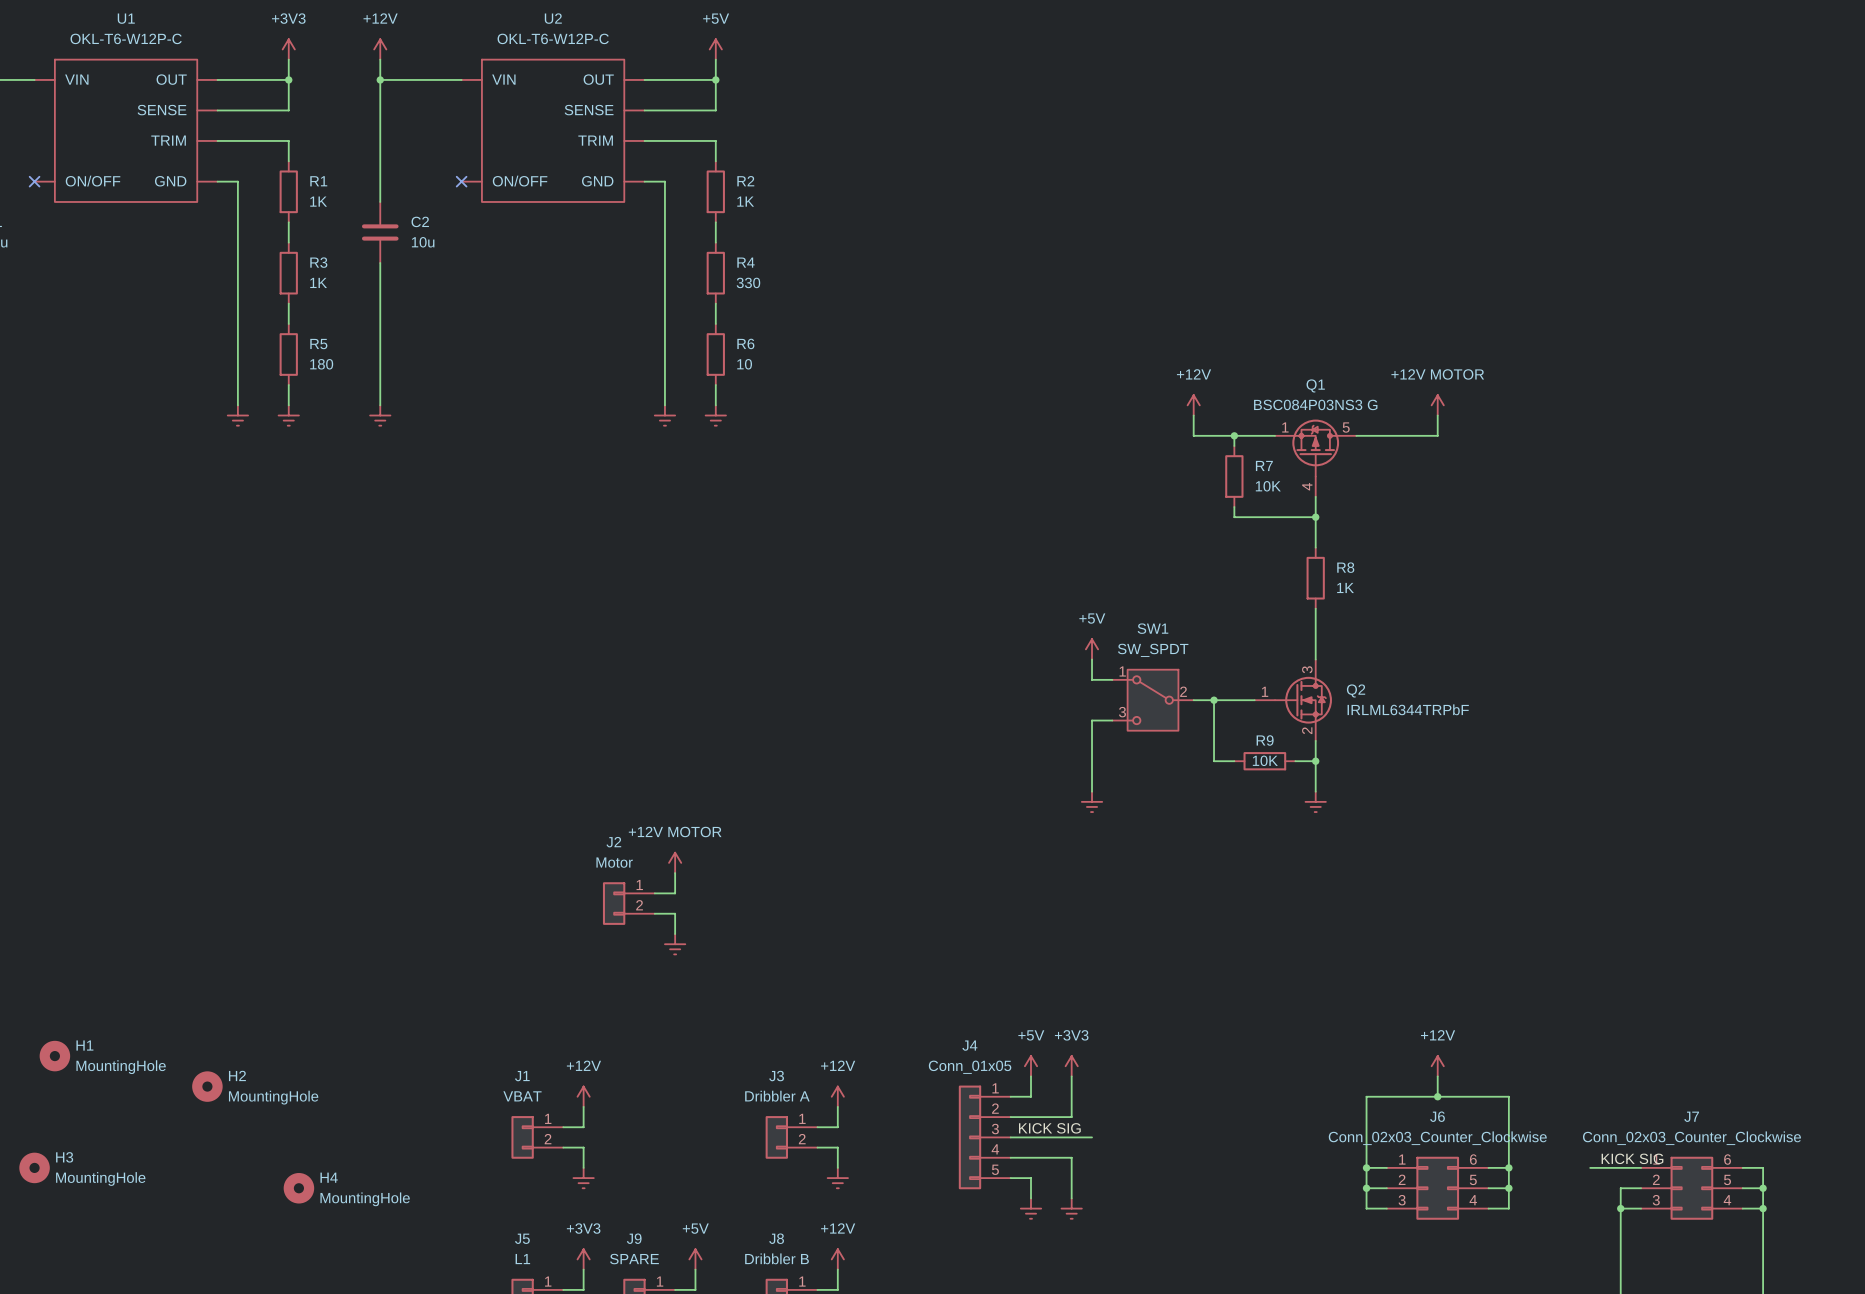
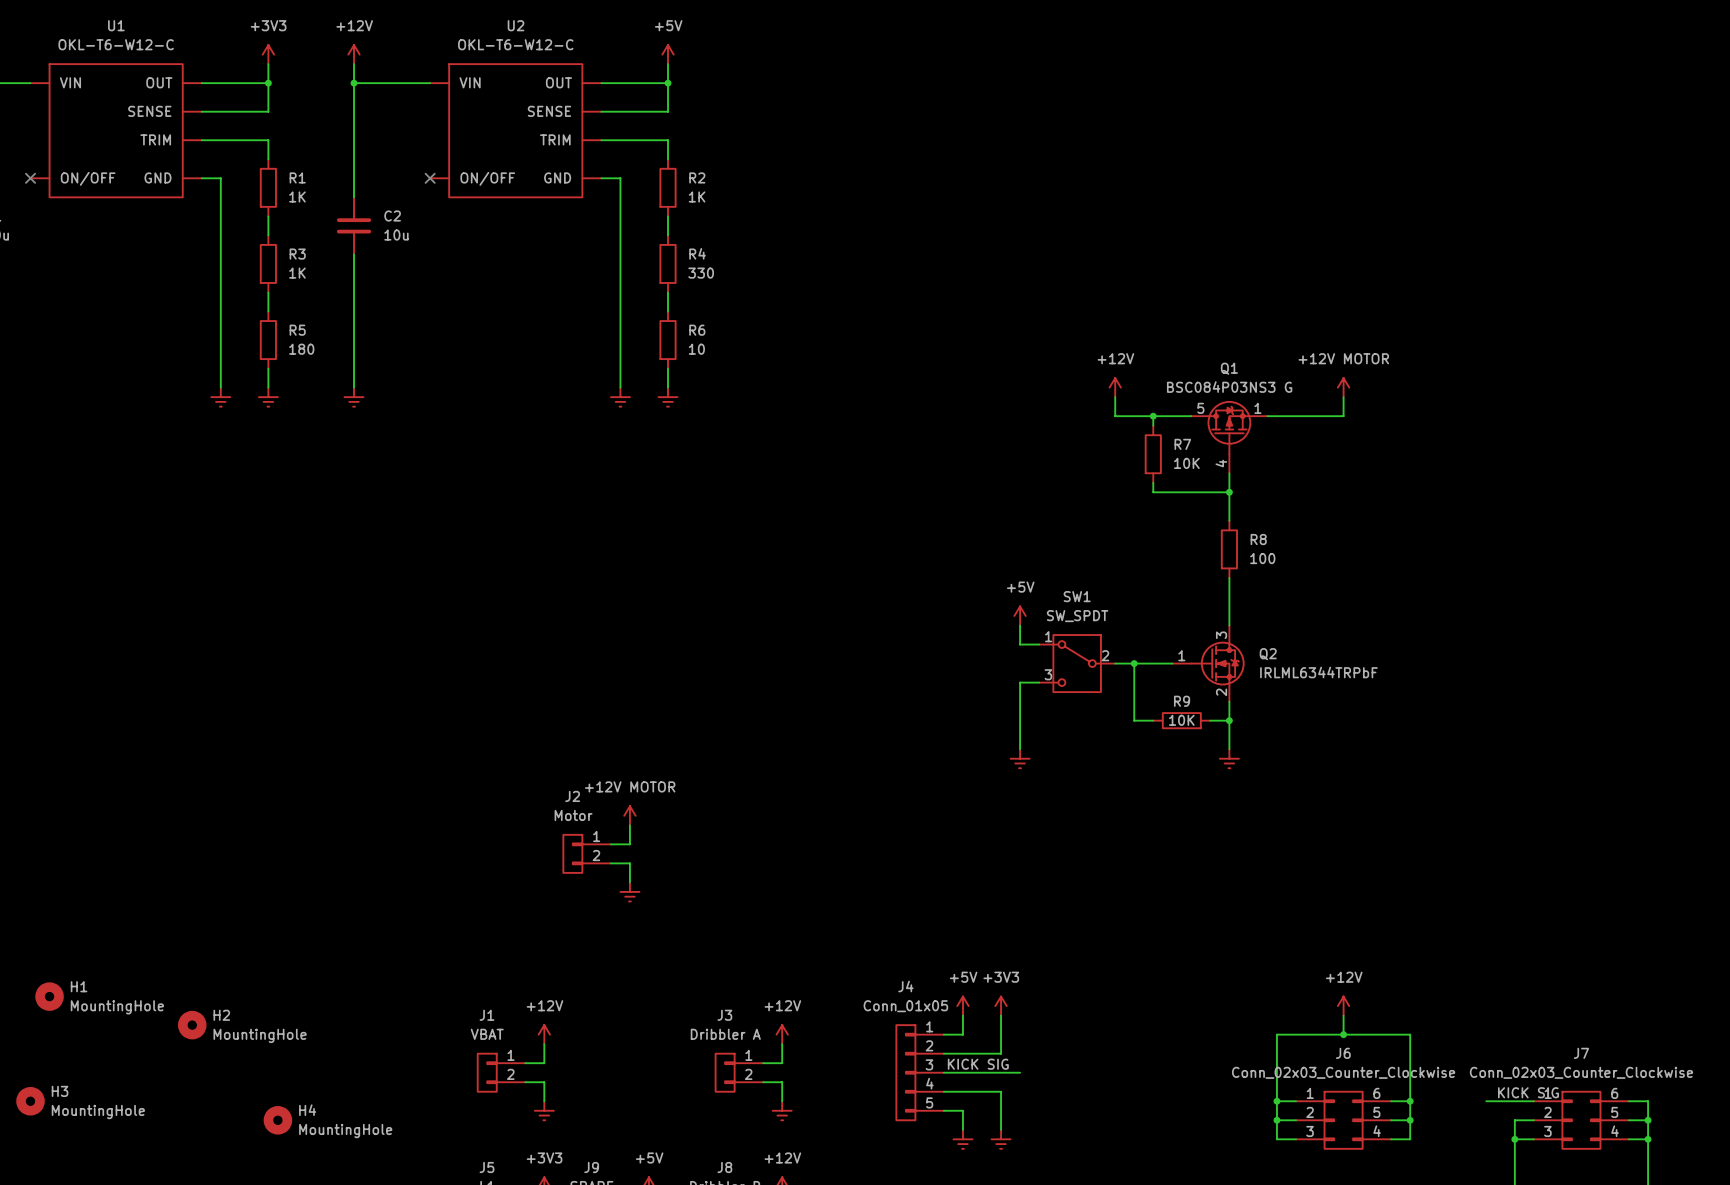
U1 value: OKL-T6-W12P-C (126, 38) -> OKL-T6-W12-C (116, 44)
U2 value: OKL-T6-W12P-C (553, 38) -> OKL-T6-W12-C (515, 44)
Q1 flip: as is (1315, 448) -> left-right (1229, 427)
R8 value: 1K (1345, 587) -> 100 (1262, 558)

